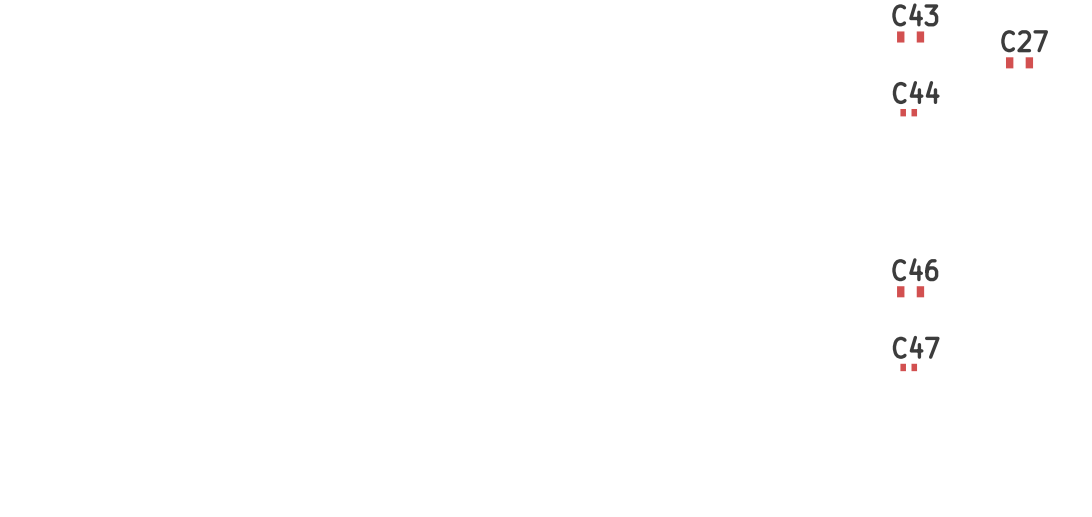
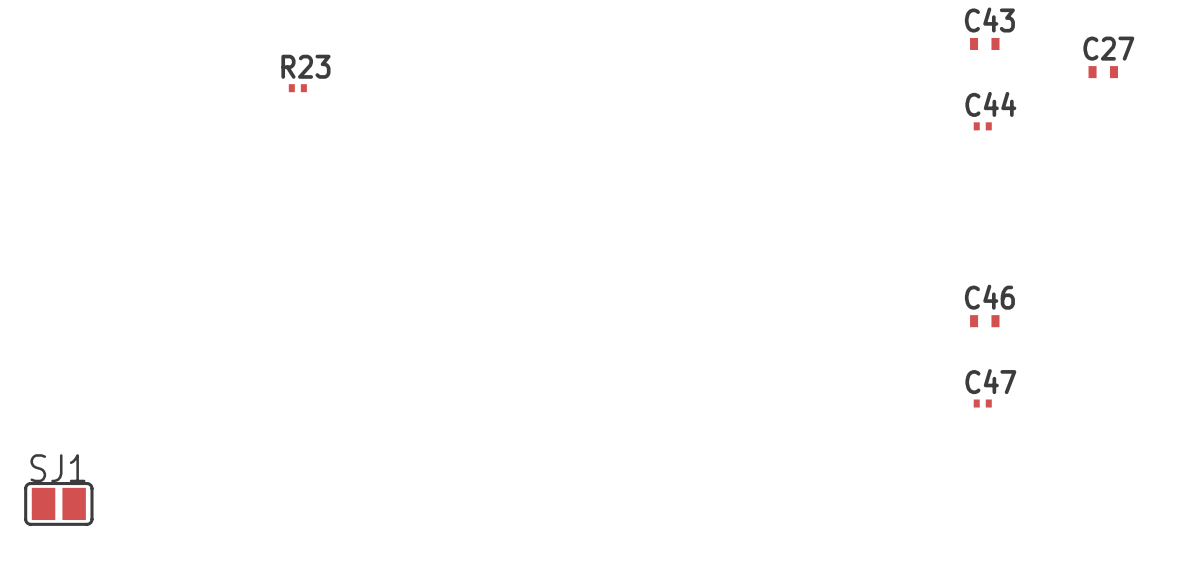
R23: none -> (297, 88)
SJ1: none -> (58, 503)

